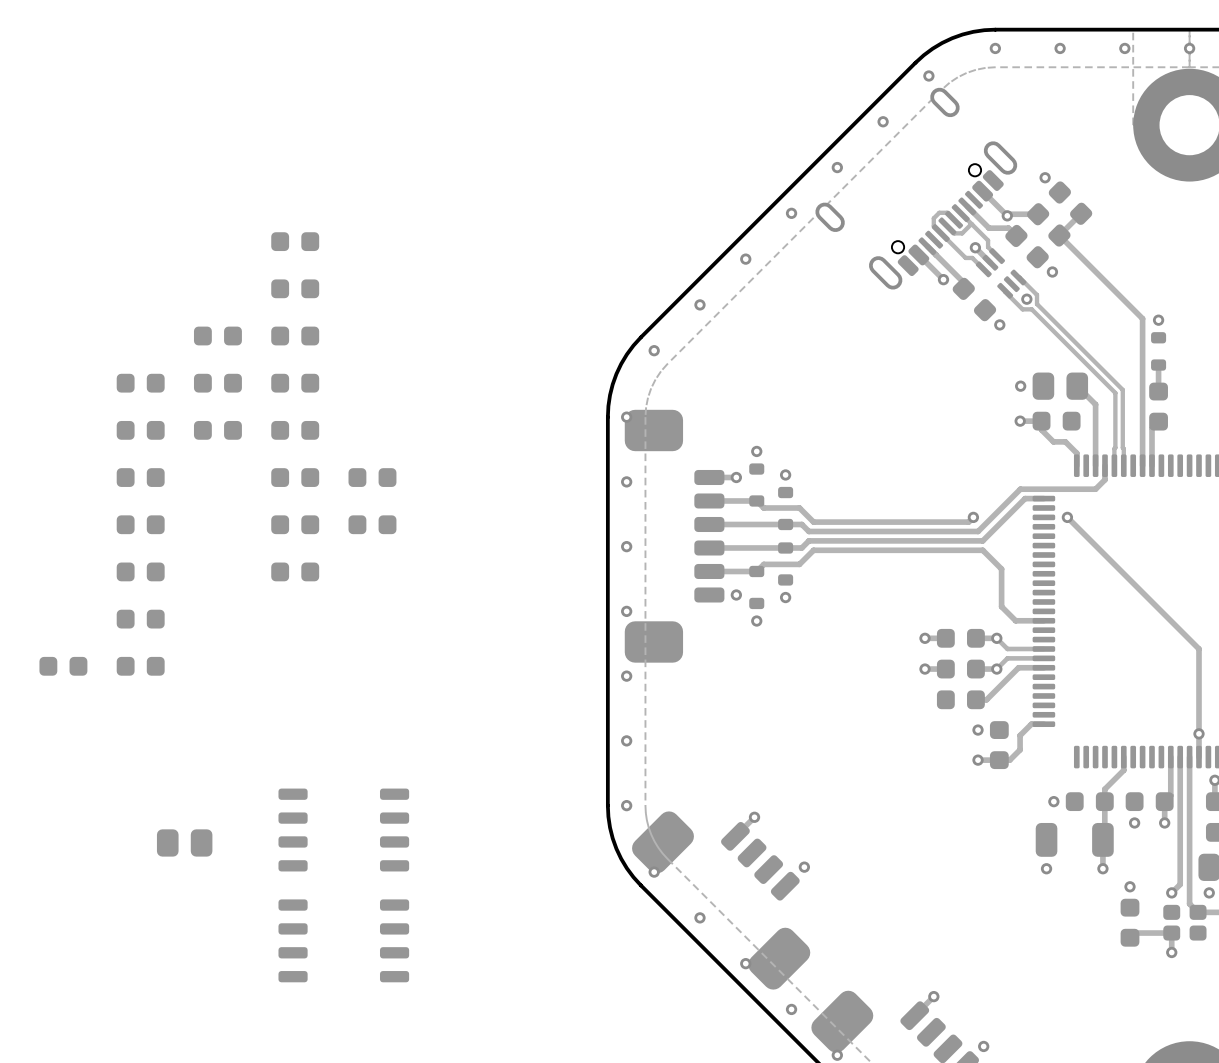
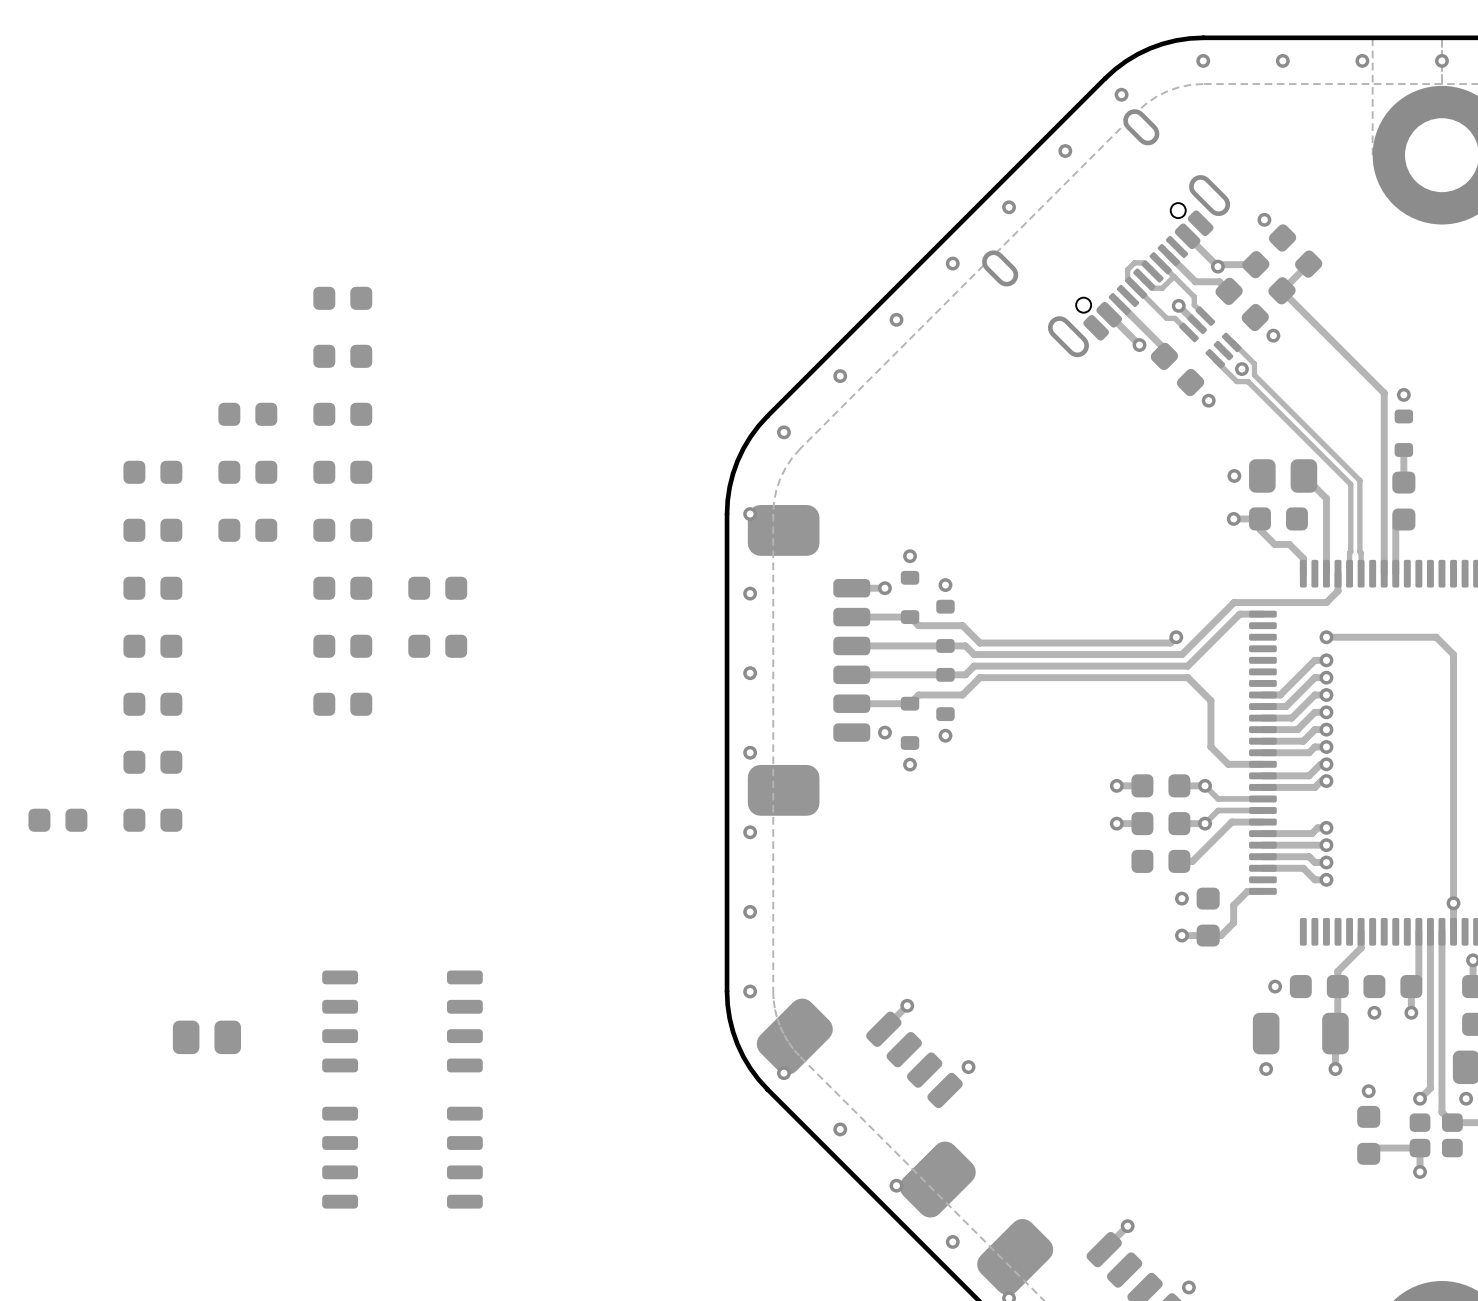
track: (1067, 517) (1198, 648) -> (1326, 637) (1436, 637) (1453, 654) (1453, 798)
via: (1067, 517) -> none
via: none -> (1326, 637)
track: none -> (1326, 660) (1314, 660) (1280, 694) (1262, 694)
via: none -> (1326, 660)
track: none -> (1326, 677) (1314, 677) (1286, 706) (1262, 706)
via: none -> (1326, 677)
track: none -> (1326, 694) (1314, 694) (1291, 718) (1262, 718)
via: none -> (1326, 694)
track: none -> (1326, 712) (1314, 712) (1297, 729) (1262, 729)
via: none -> (1326, 712)
track: none -> (1326, 729) (1314, 729) (1303, 741) (1262, 741)
via: none -> (1326, 729)
track: none -> (1326, 746) (1314, 746) (1309, 752) (1262, 752)
via: none -> (1326, 746)
track: none -> (1326, 764) (1320, 764) (1309, 775) (1262, 775)
via: none -> (1326, 764)
track: none -> (1326, 781) (1321, 781) (1314, 787) (1262, 787)
via: none -> (1326, 781)
track: none -> (1326, 827) (1317, 827) (1312, 833) (1262, 833)
via: none -> (1326, 827)
track: none -> (1262, 845) (1326, 845)
via: none -> (1326, 845)
track: none -> (1262, 856) (1309, 856) (1314, 862) (1326, 862)
via: none -> (1326, 862)
track: none -> (1262, 868) (1303, 868) (1314, 879) (1326, 879)
via: none -> (1326, 879)

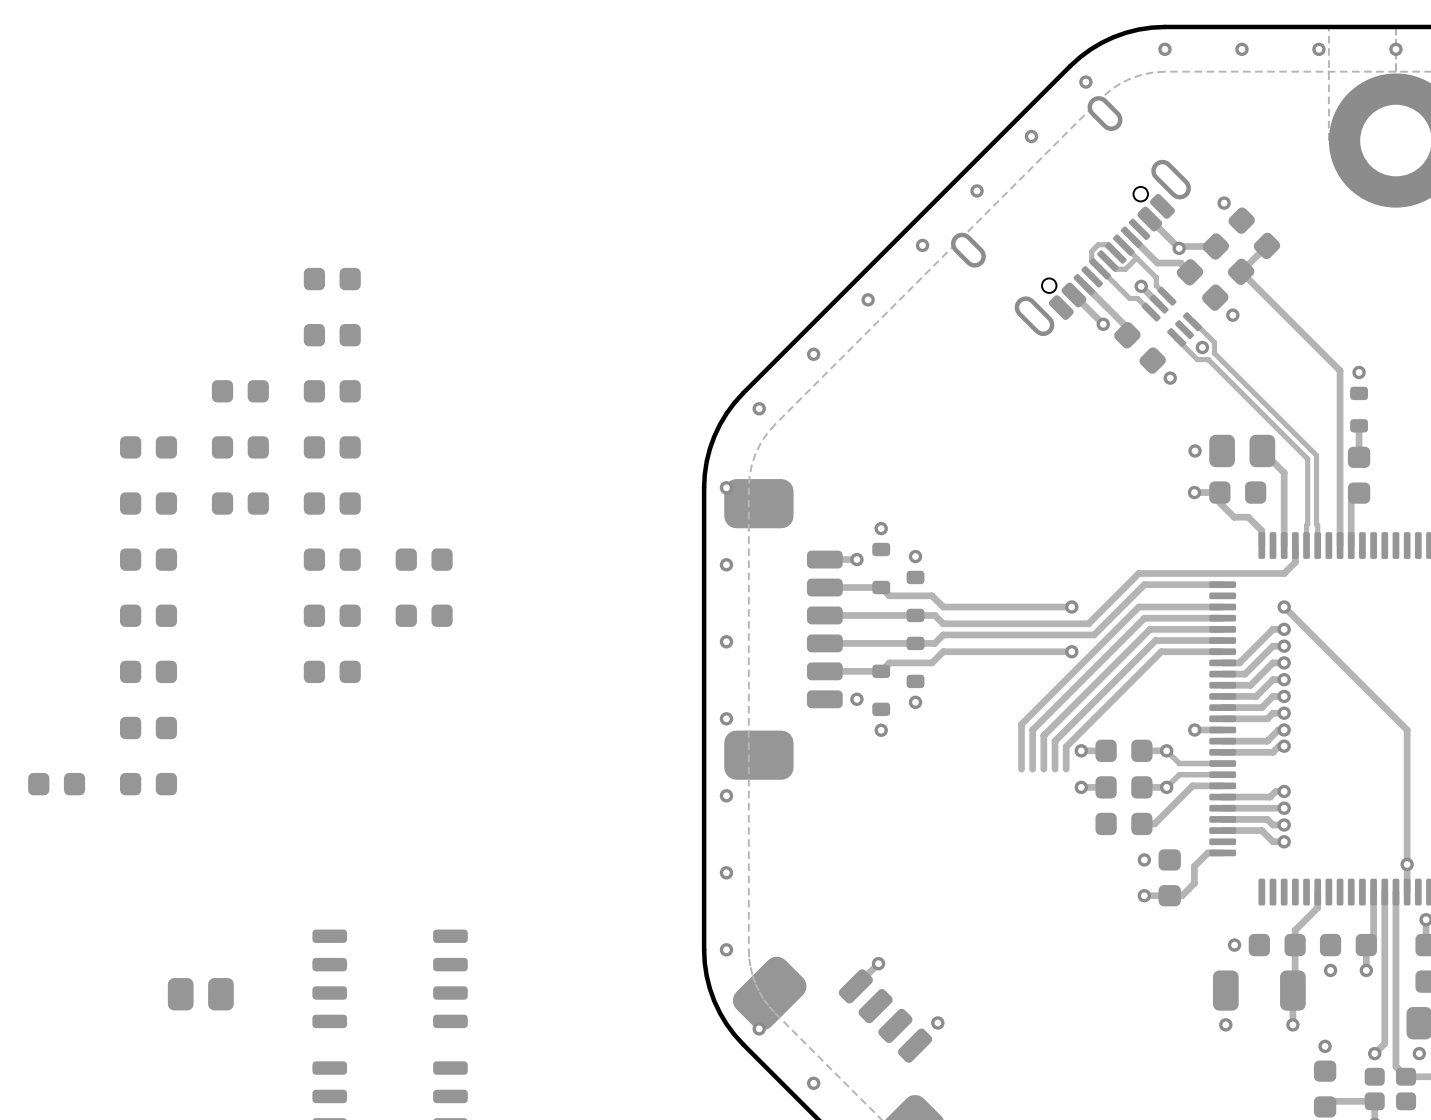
track: (1234, 602) (1182, 654) (1124, 654) -> (1194, 573) (1138, 573) (1088, 623)
track: (1239, 614) (1187, 666) (1130, 666) -> (1200, 584) (1144, 584) (1094, 634)
track: (974, 637) (979, 643) (1170, 643) -> (943, 607) (1071, 607)
via: none -> (1071, 607)
track: none -> (1138, 607) (1222, 607)
via: (1176, 637) -> none
track: (1326, 637) (1436, 637) (1453, 654) (1453, 764) -> (1284, 607) (1407, 729)
track: none -> (1133, 612) (1021, 724) (1021, 769)
track: none -> (1222, 618) (1144, 618) (1032, 729) (1032, 769)
track: none -> (1222, 629) (1150, 629) (1043, 735) (1043, 769)
track: none -> (1222, 640) (1155, 640) (1055, 741) (1055, 769)
track: (974, 683) (979, 677) (1187, 677) (1210, 700) (1210, 746) (1228, 764) (1234, 764) -> (943, 651) (1071, 651)
via: none -> (1071, 651)
track: none -> (1222, 651) (1161, 651) (1066, 746) (1066, 769)
via: none -> (1194, 729)

